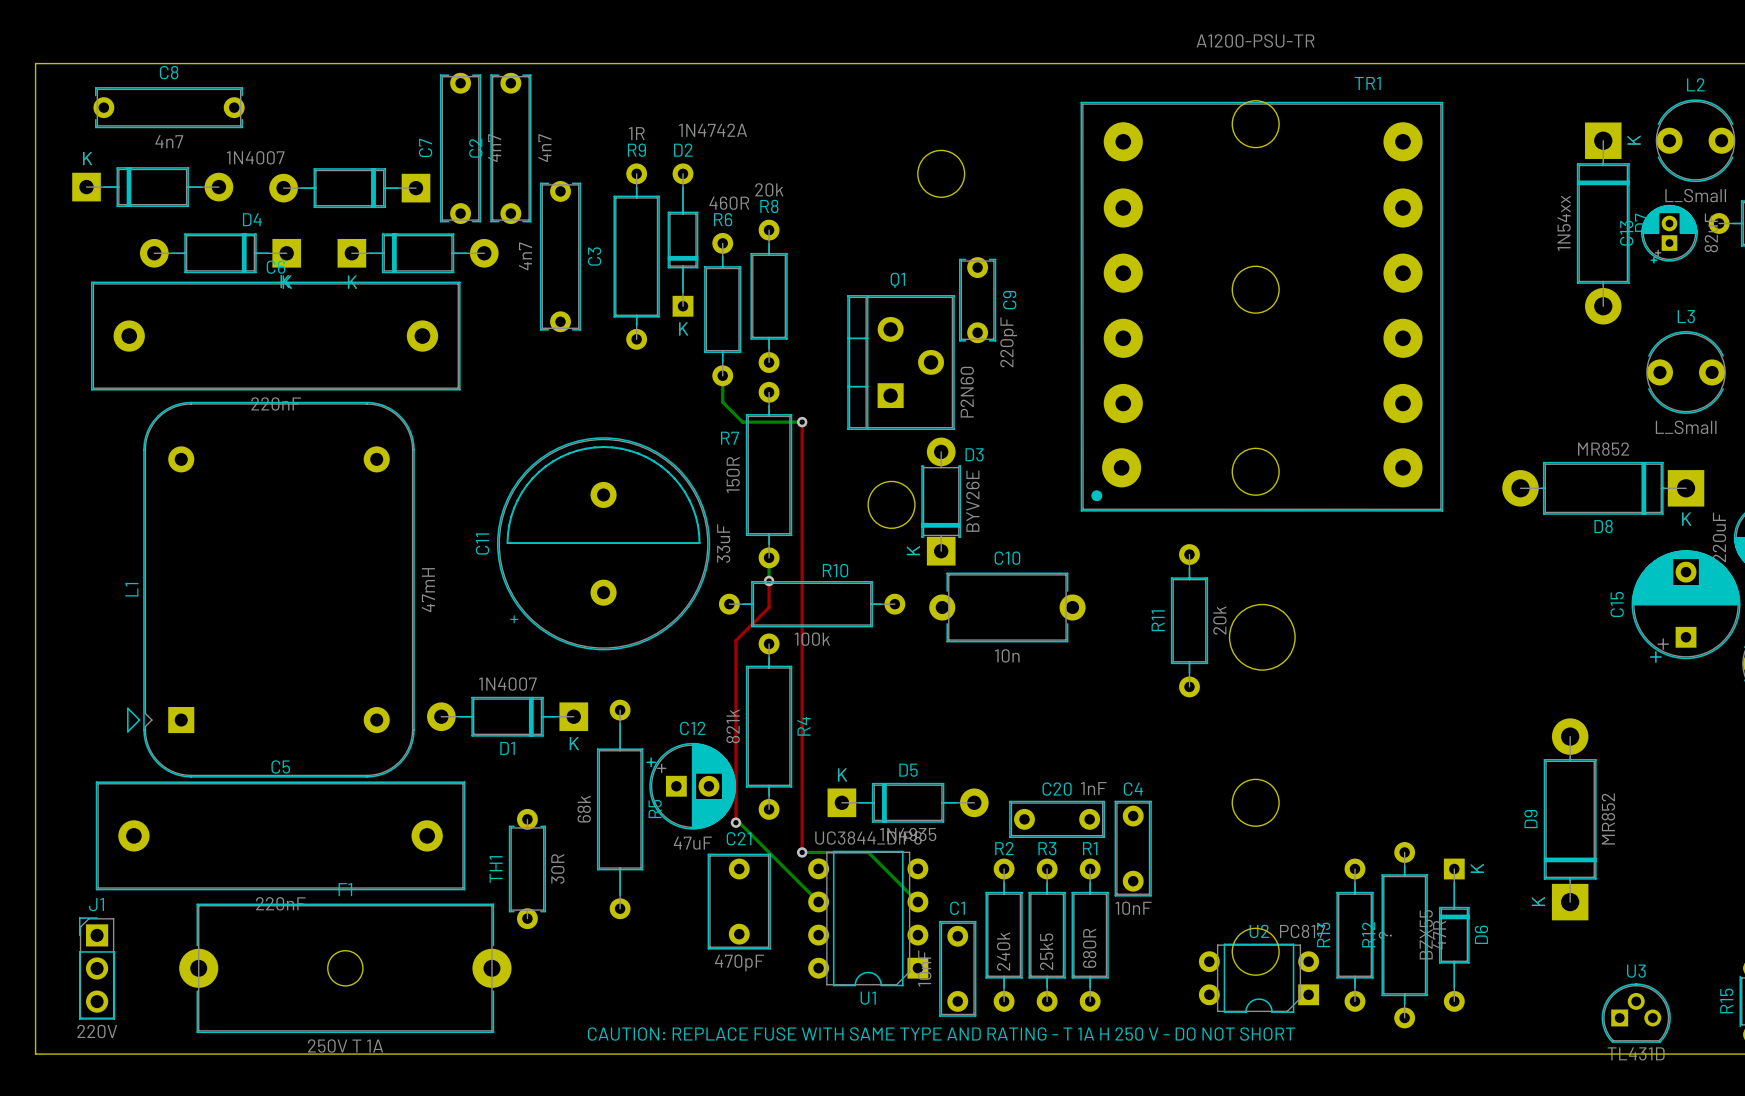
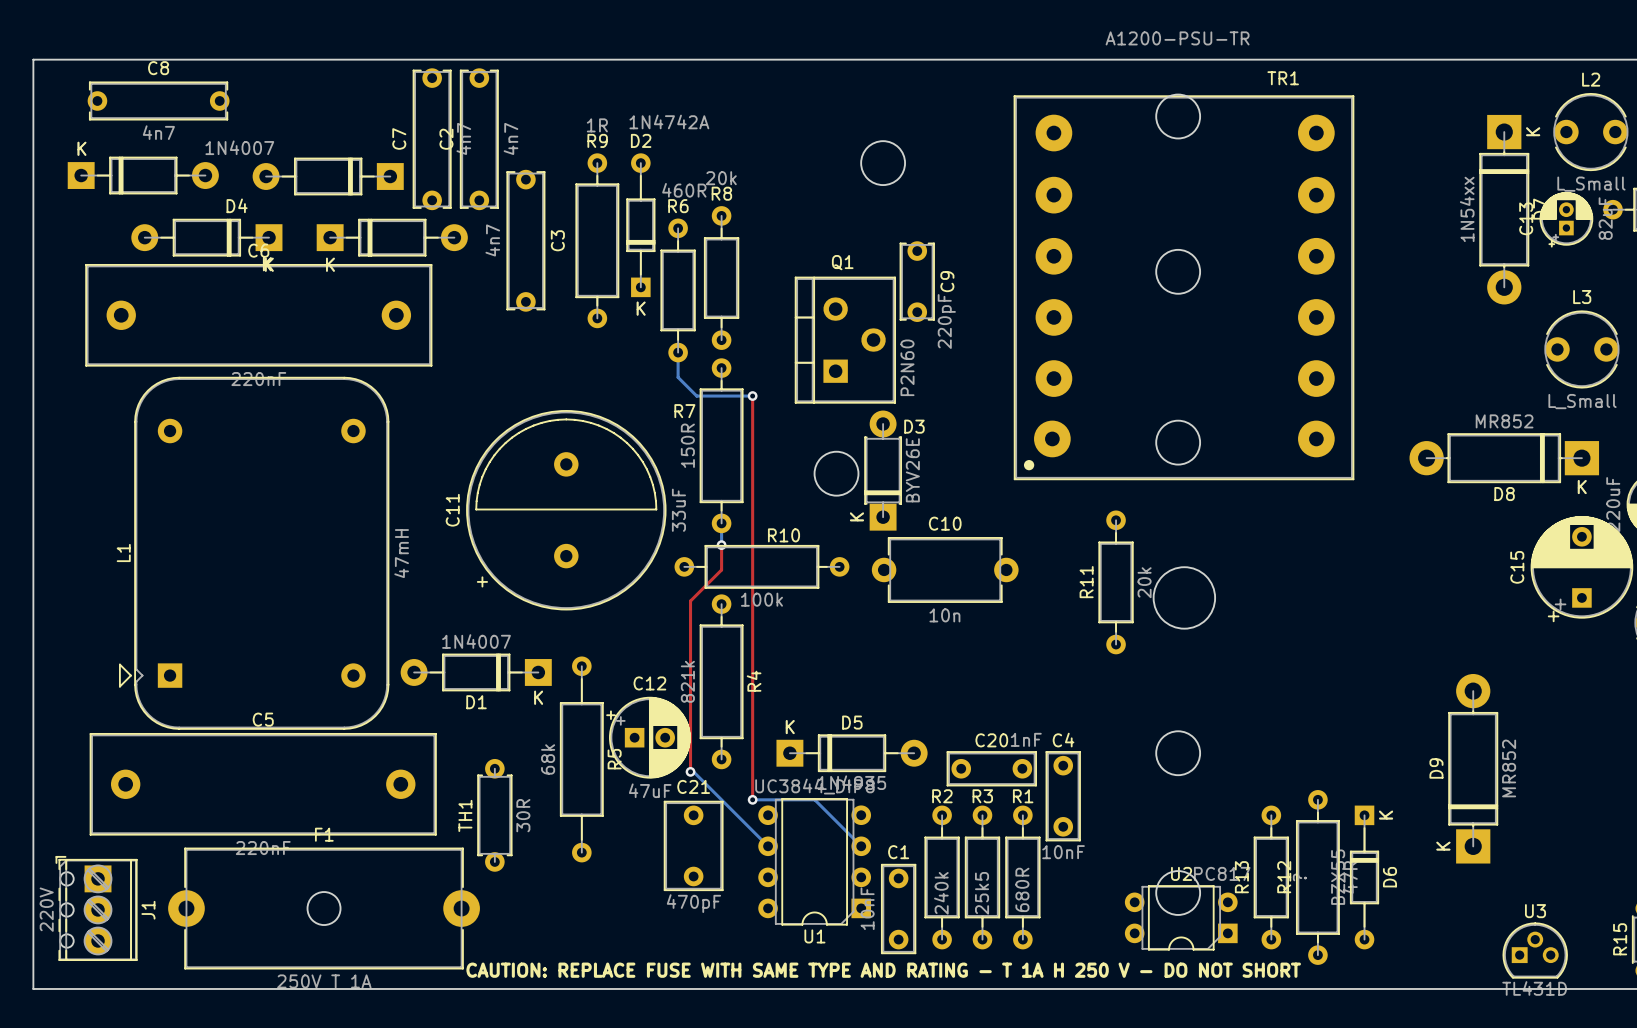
J1 name position: J1 (96, 904) -> J1 (148, 910)
J1 footprint: [78, 917, 116, 1020] -> [55, 856, 138, 961]
J1 value position: 220V (97, 1031) -> 220V (46, 909)

